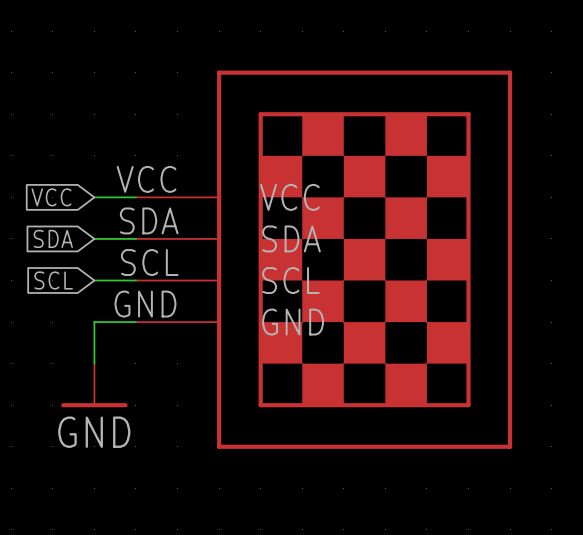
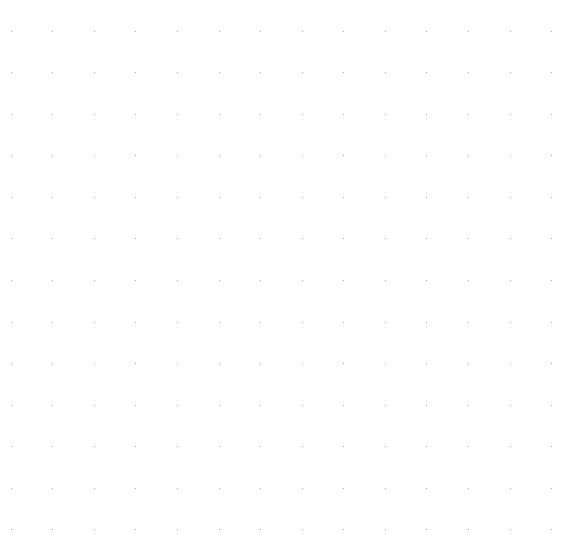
global label: VCC (51, 197) -> none
wire: (94, 197) (135, 197) -> none
global label: SDA (53, 238) -> none
wire: (94, 238) (135, 238) -> none
part: (324, 259) -> none
global label: SCL (53, 280) -> none
wire: (94, 280) (135, 280) -> none
wire: (135, 322) (94, 322) (94, 363) -> none
power symbol: GND (94, 385) -> none

